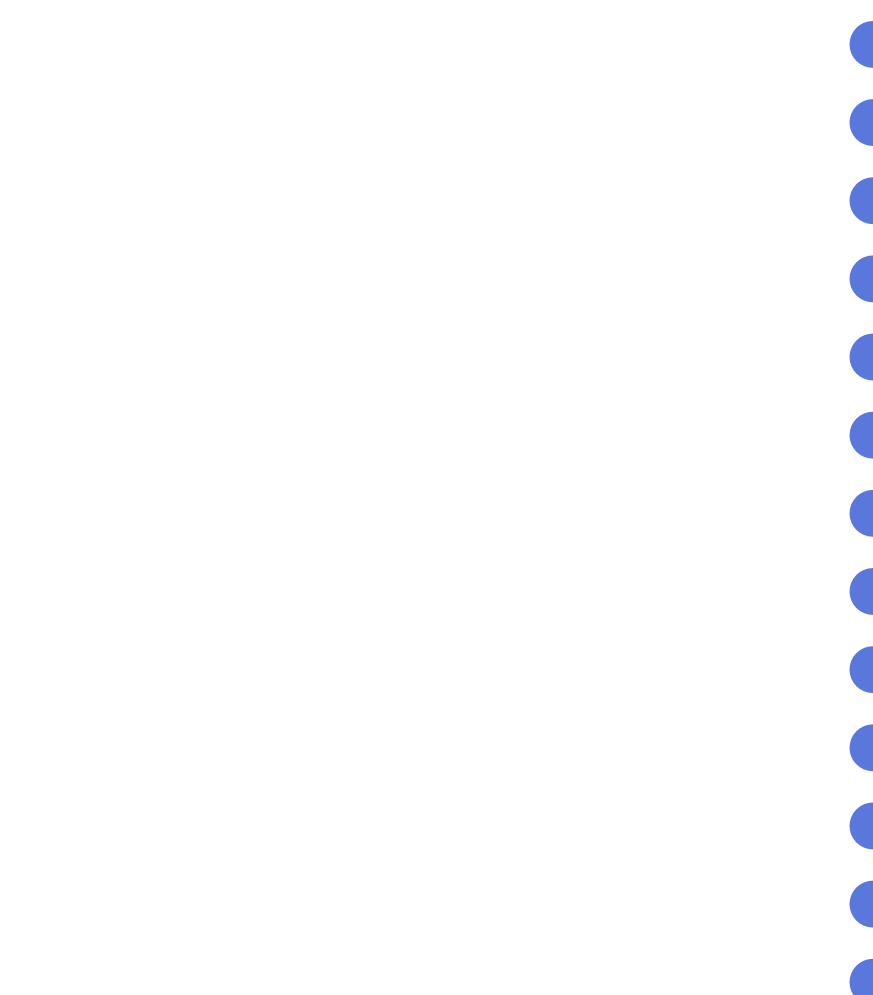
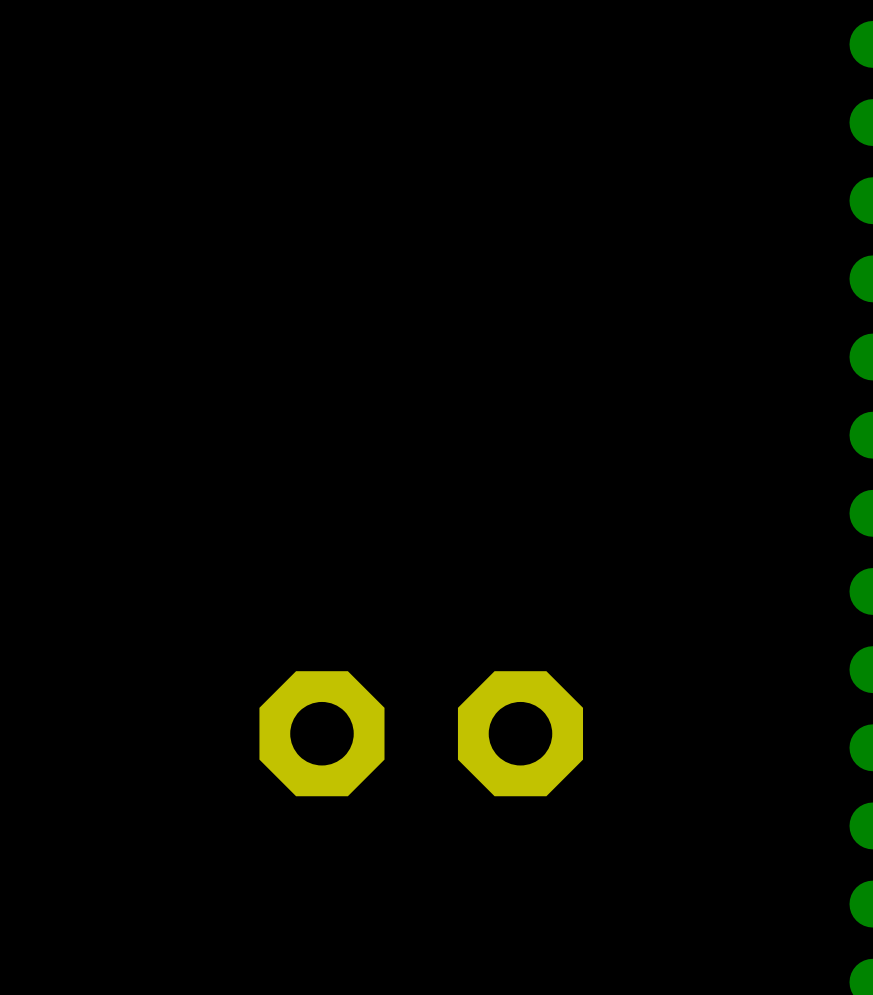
part: none -> (421, 733)

